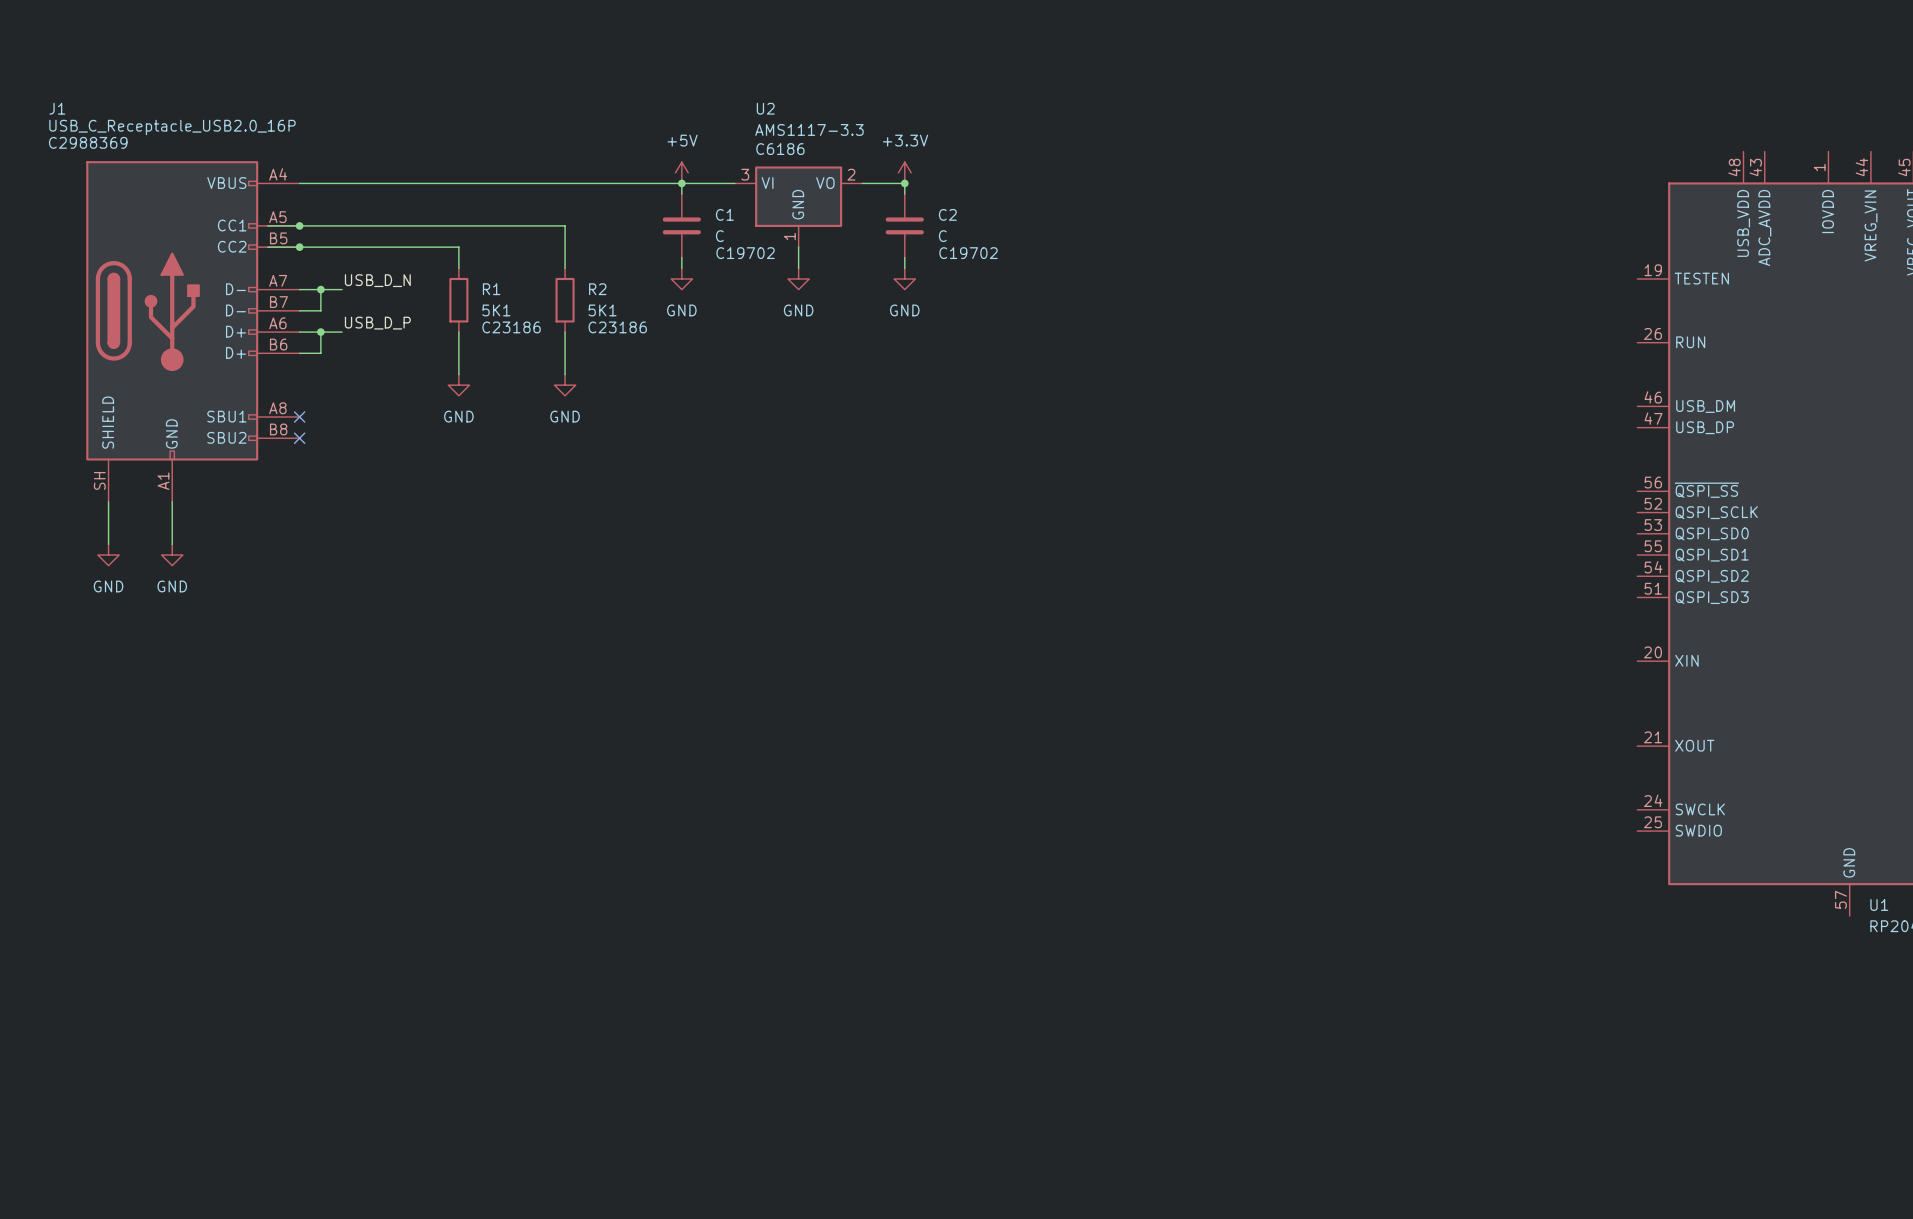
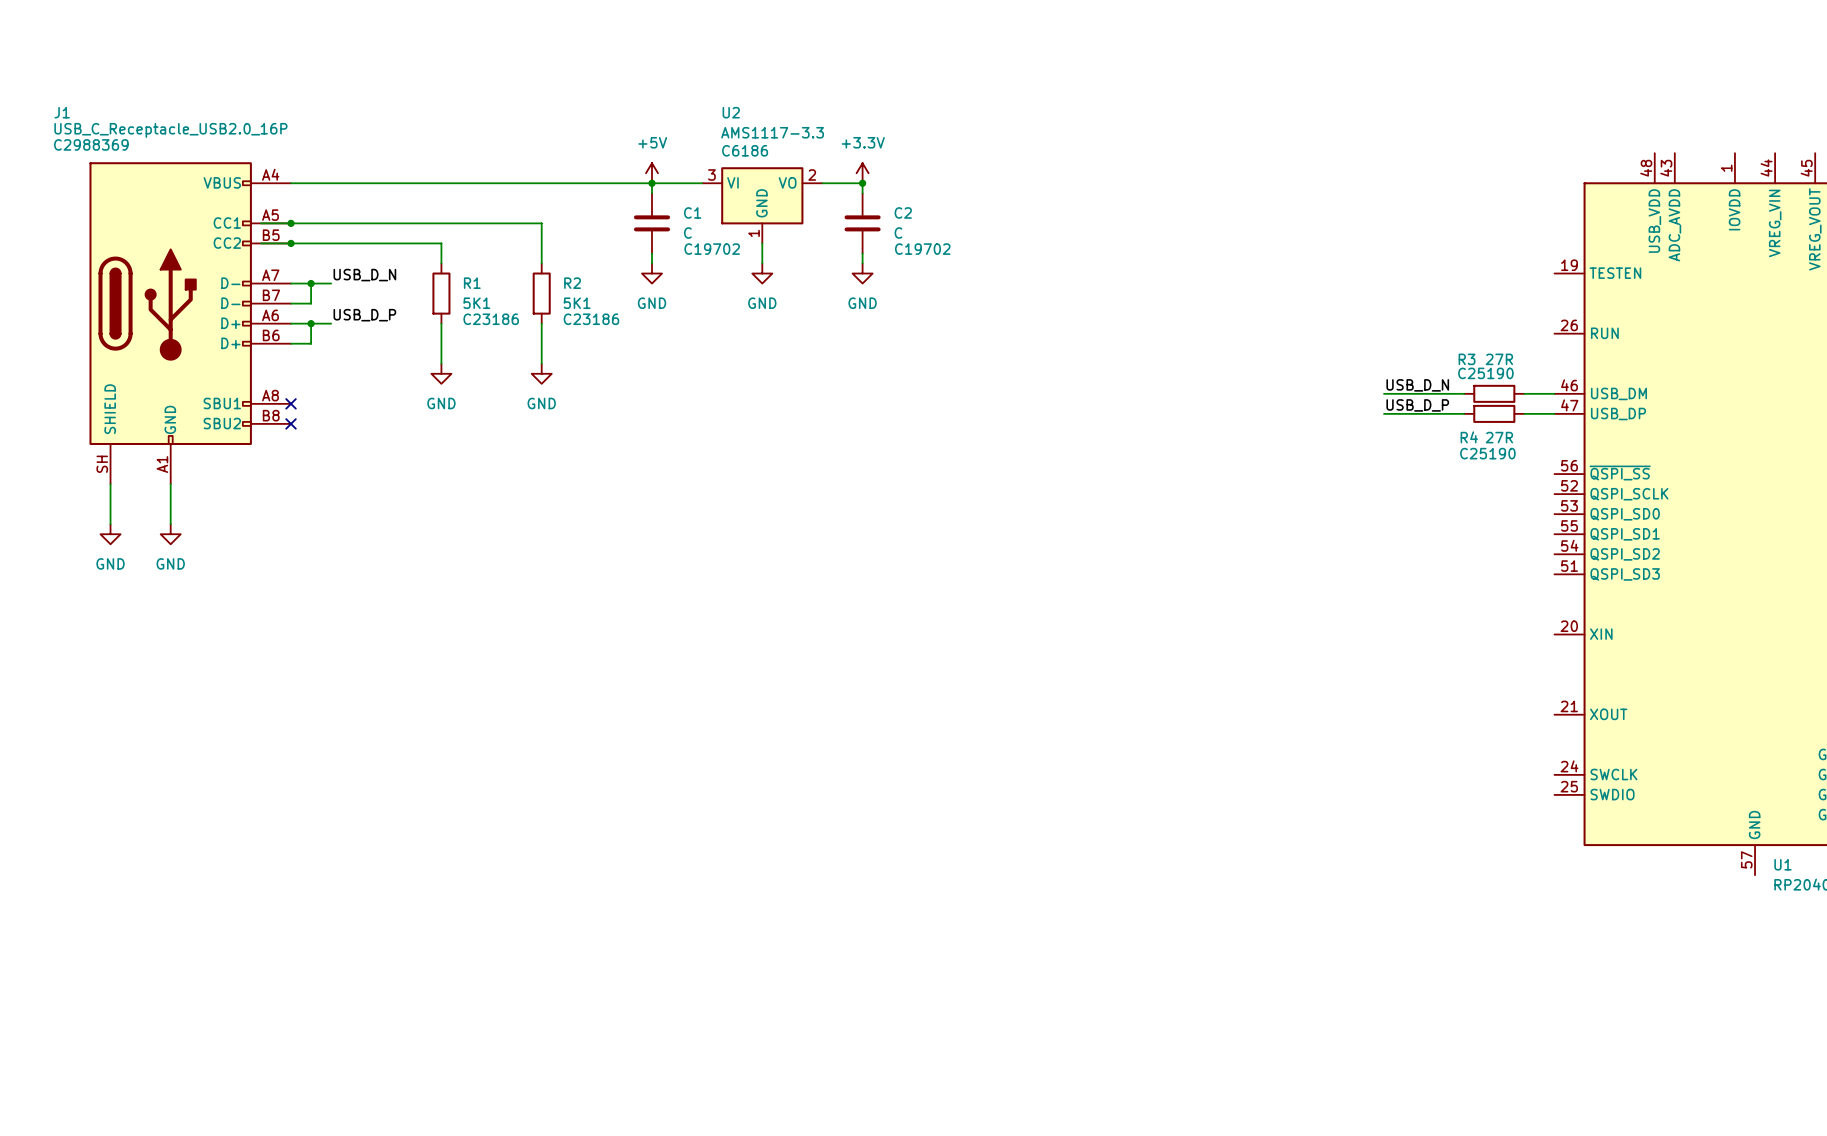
label: none -> USB_D_N (1417, 385)
wire: none -> (1384, 393) (1464, 393)
R3: none -> 27R (1494, 393)
wire: none -> (1524, 393) (1554, 393)
label: none -> USB_D_P (1417, 405)
wire: none -> (1384, 413) (1464, 413)
R4: none -> 27R (1494, 413)
wire: none -> (1524, 413) (1554, 413)

